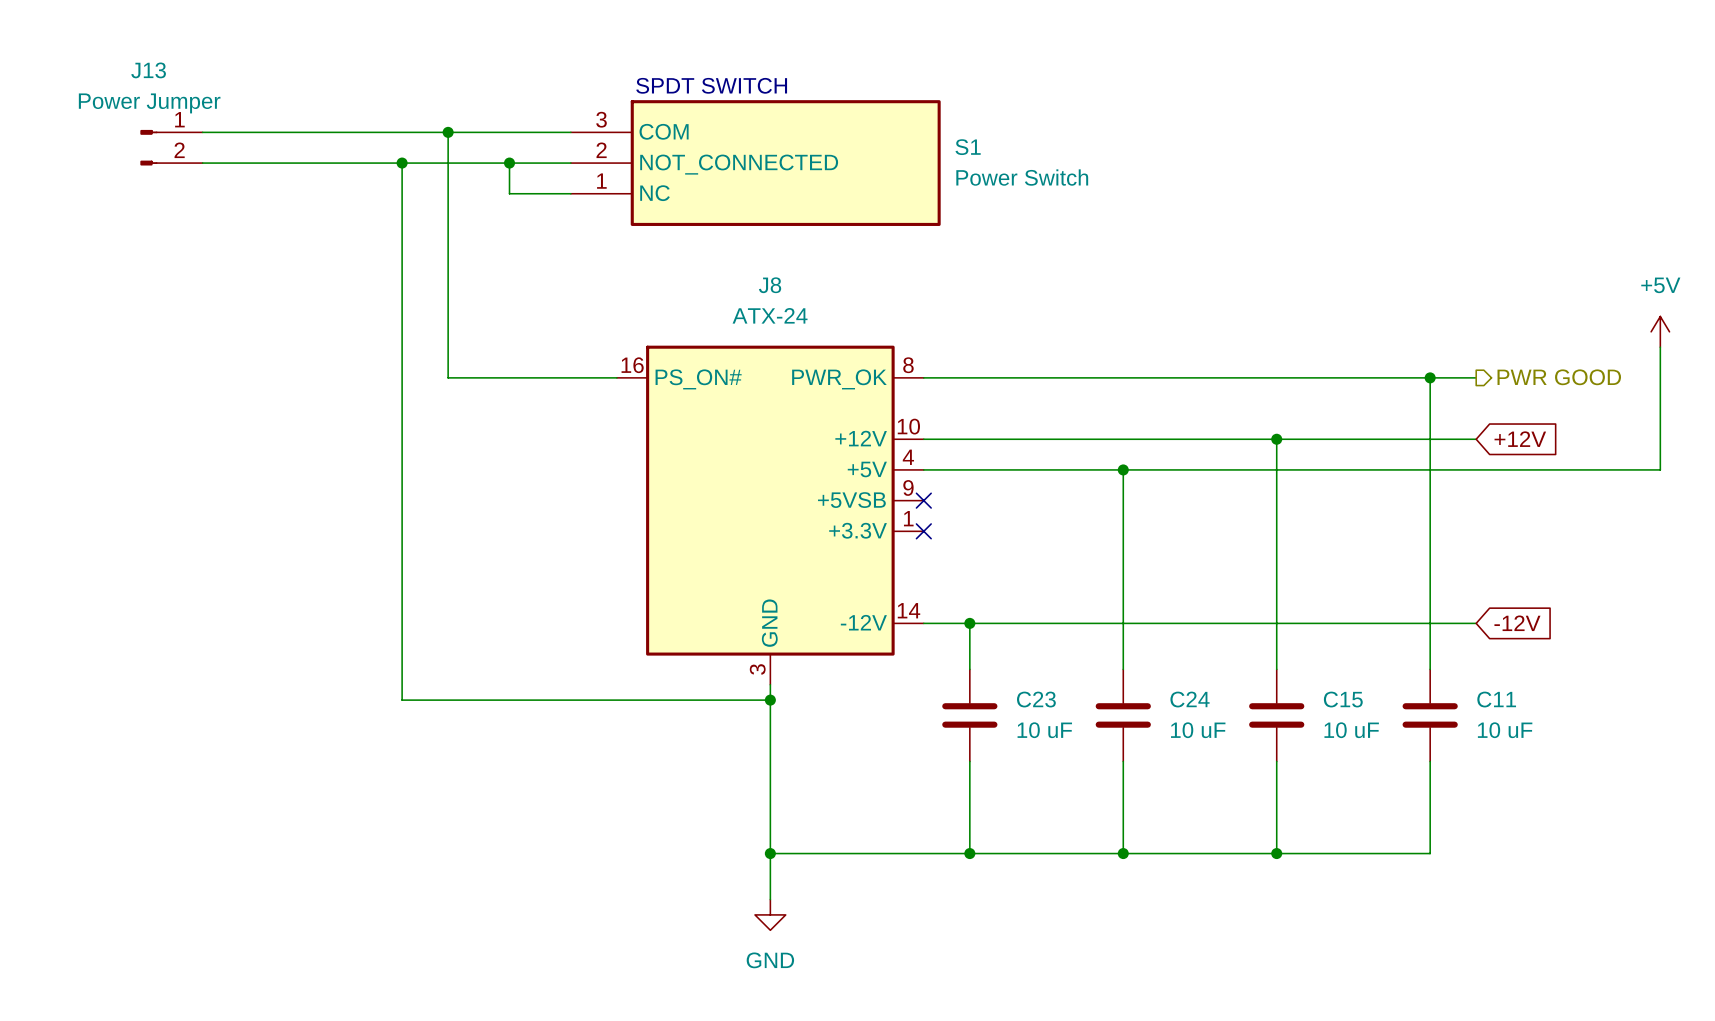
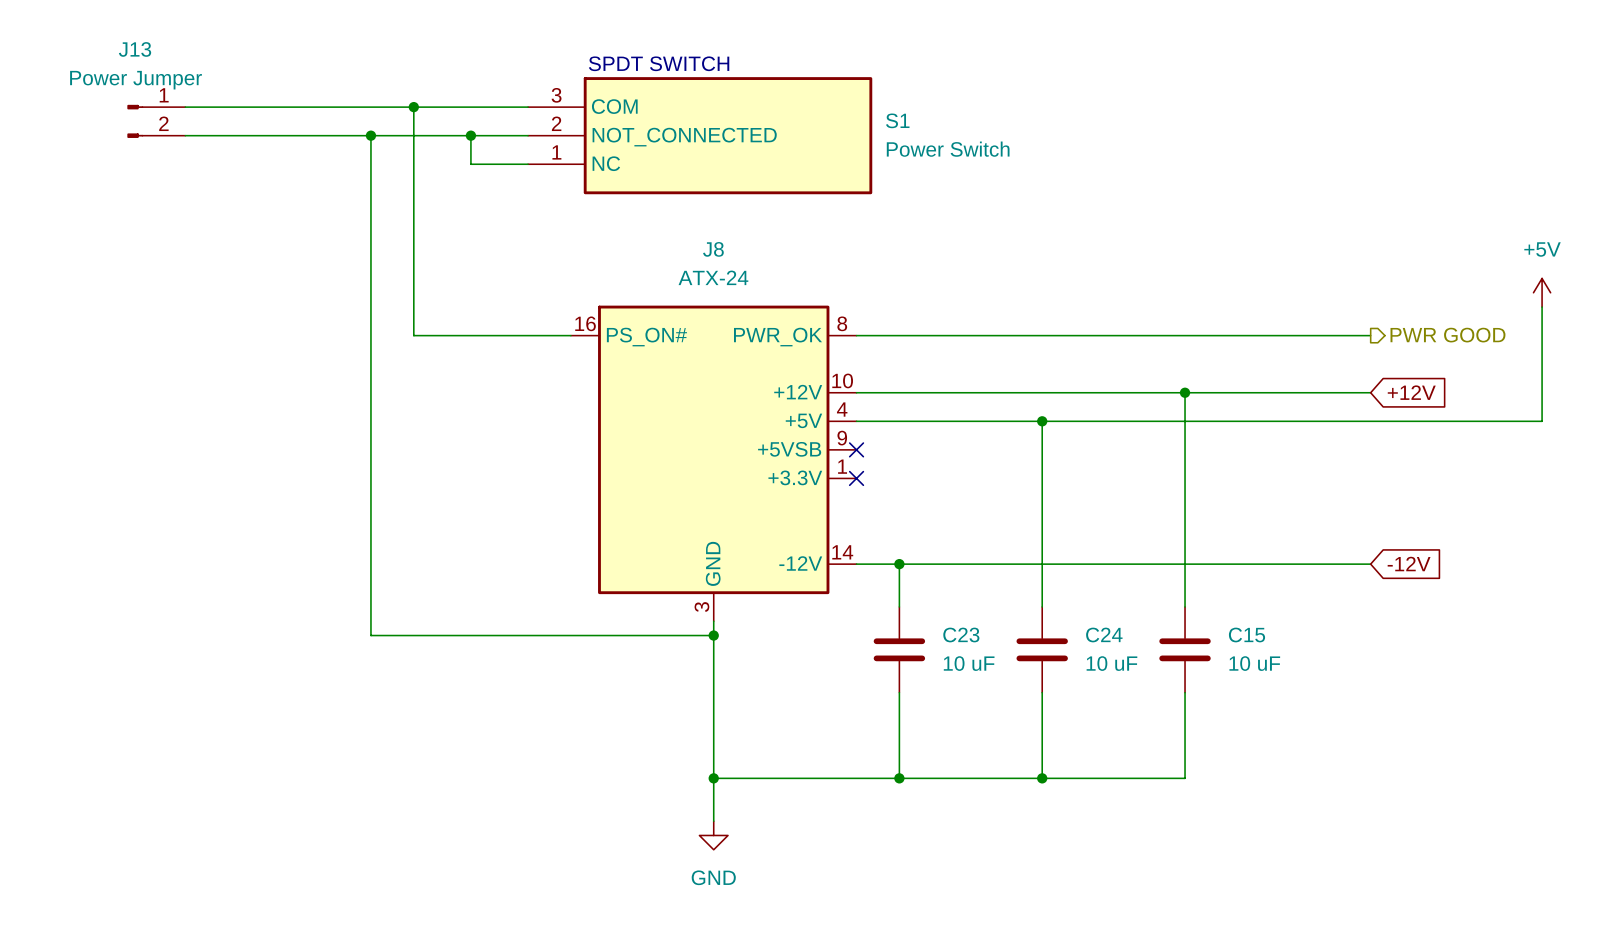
wire: (1430, 377) (1430, 669) -> none
junction: (1430, 377) -> none
C11: 10 uF (1430, 715) -> none
wire: (1430, 761) (1430, 853) (1276, 853) -> none
junction: (1276, 853) -> none

